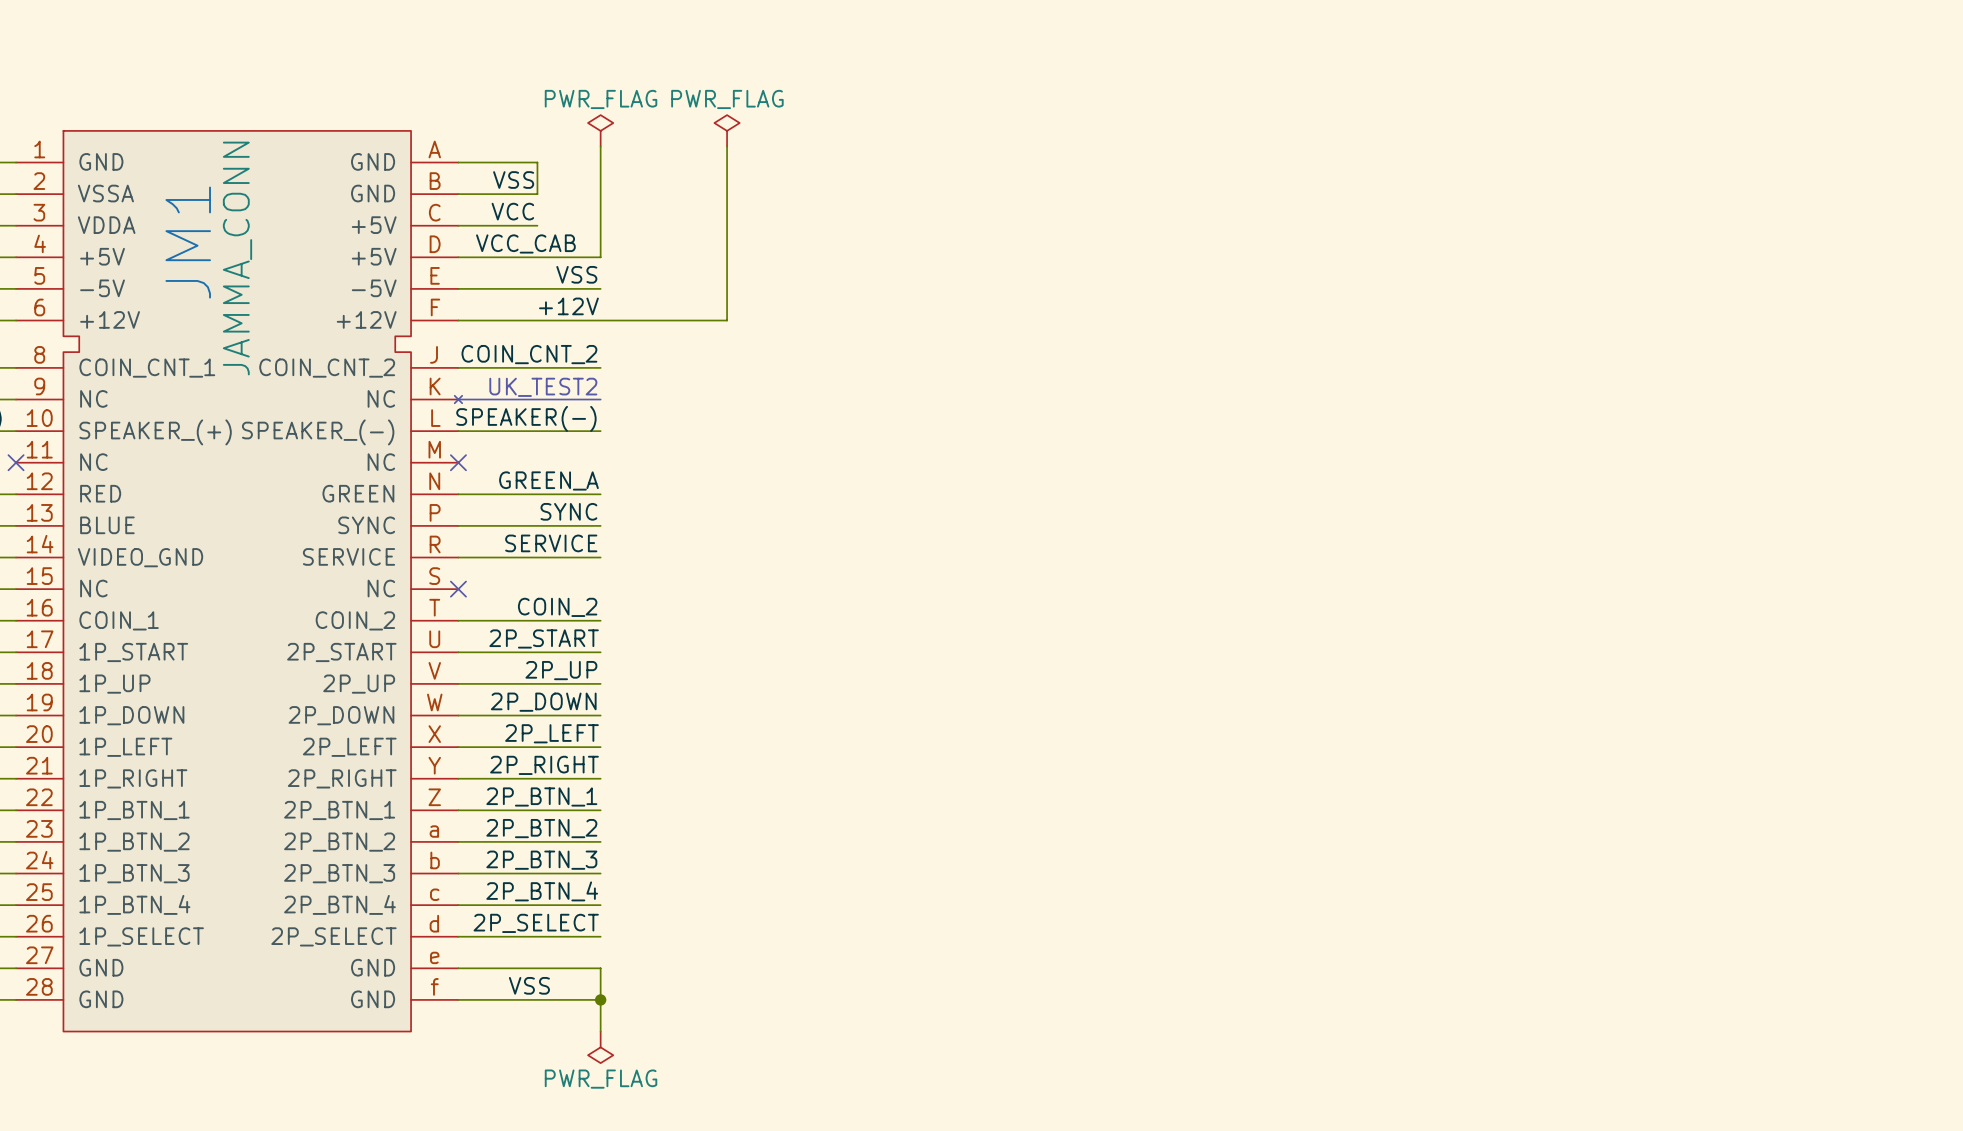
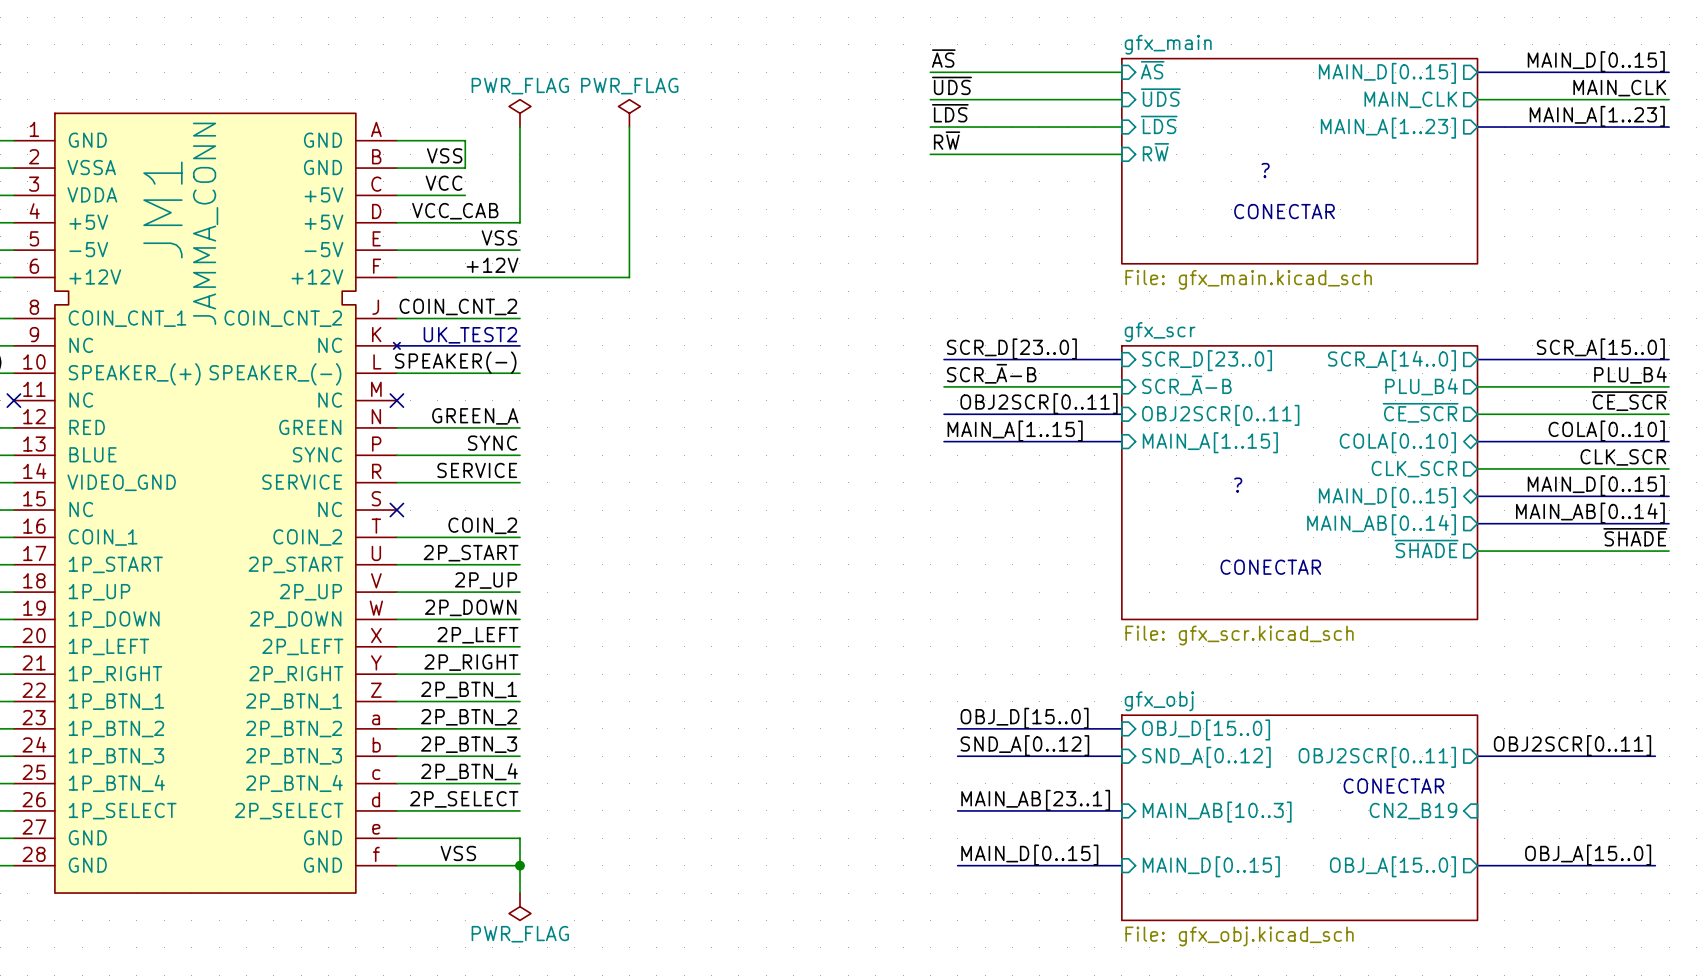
label: none -> ~{AS} (943, 58)
label: none -> MAIN_D[0..15] (1596, 61)
sheet pin: none -> ~{AS} (1152, 70)
wire: none -> (930, 72) (1121, 72)
bus: none -> (1477, 72) (1669, 72)
sheet pin: none -> MAIN_D[0..15] (1387, 73)
label: none -> ~{UDS} (951, 85)
label: none -> MAIN_CLK (1619, 88)
sheet pin: none -> ~{UDS} (1160, 97)
wire: none -> (930, 99) (1121, 99)
sheet pin: none -> MAIN_CLK (1410, 99)
wire: none -> (1477, 99) (1669, 99)
label: none -> ~{LDS} (950, 113)
label: none -> MAIN_A[1..23] (1597, 116)
sheet pin: none -> ~{LDS} (1159, 124)
wire: none -> (930, 127) (1121, 127)
bus: none -> (1477, 127) (1669, 127)
sheet pin: none -> MAIN_A[1..23] (1388, 128)
label: none -> R~{W} (947, 140)
sheet pin: none -> R~{W} (1155, 152)
wire: none -> (930, 154) (1121, 154)
sheet gfx_main: none -> File: gfx_main.kicad_sch (1299, 161)
text: none -> ? (1265, 170)
text: none -> CONECTAR (1284, 211)
label: none -> SCR_D[23..0] (1011, 348)
label: none -> SCR_A[15..0] (1600, 348)
bus: none -> (944, 359) (1121, 359)
bus: none -> (1477, 359) (1669, 359)
sheet pin: none -> SCR_D[23..0] (1207, 360)
sheet pin: none -> SCR_A[14..0] (1391, 360)
label: none -> SCR_~{A}-B (991, 373)
label: none -> PLU_B4 (1630, 375)
sheet pin: none -> SCR_~{A}-B (1186, 385)
wire: none -> (944, 386) (1121, 386)
sheet pin: none -> PLU_B4 (1421, 386)
wire: none -> (1477, 386) (1669, 386)
label: none -> ~{CE_SCR} (1629, 401)
label: none -> OBJ2SCR[0..11] (1039, 403)
sheet pin: none -> ~{CE_SCR} (1420, 412)
bus: none -> (944, 414) (1121, 414)
wire: none -> (1477, 414) (1669, 414)
sheet pin: none -> OBJ2SCR[0..11] (1220, 415)
label: none -> MAIN_A[1..15] (1015, 431)
label: none -> COLA[0..10] (1606, 431)
bus: none -> (944, 441) (1121, 441)
bus: none -> (1477, 441) (1669, 441)
sheet pin: none -> MAIN_A[1..15] (1210, 442)
sheet pin: none -> COLA[0..10] (1397, 442)
label: none -> CLK_SCR (1623, 457)
sheet pin: none -> CLK_SCR (1414, 469)
wire: none -> (1477, 468) (1669, 468)
sheet gfx_scr: none -> File: gfx_scr.kicad_sch (1299, 482)
text: none -> ? (1238, 485)
label: none -> MAIN_D[0..15] (1596, 485)
bus: none -> (1477, 496) (1669, 496)
sheet pin: none -> MAIN_D[0..15] (1387, 497)
label: none -> MAIN_AB[0..14] (1590, 513)
bus: none -> (1477, 523) (1669, 523)
sheet pin: none -> MAIN_AB[0..14] (1381, 524)
label: none -> ~{SHADE} (1635, 537)
sheet pin: none -> ~{SHADE} (1426, 548)
wire: none -> (1477, 551) (1669, 551)
text: none -> CONECTAR (1270, 567)
label: none -> OBJ_D[15..0] (1024, 718)
bus: none -> (957, 728) (1121, 728)
sheet pin: none -> OBJ_D[15..0] (1206, 729)
label: none -> SND_A[0..12] (1024, 745)
label: none -> OBJ2SCR[0..11] (1572, 745)
bus: none -> (957, 756) (1121, 756)
bus: none -> (1477, 756) (1655, 756)
sheet pin: none -> SND_A[0..12] (1206, 757)
sheet pin: none -> OBJ2SCR[0..11] (1377, 757)
text: none -> CONECTAR (1393, 786)
label: none -> MAIN_AB[23..1] (1035, 800)
bus: none -> (957, 810) (1121, 810)
sheet pin: none -> CN2_B19 (1413, 811)
sheet pin: none -> MAIN_AB[10..3] (1217, 812)
sheet gfx_obj: none -> File: gfx_obj.kicad_sch (1299, 817)
label: none -> MAIN_D[0..15] (1029, 855)
label: none -> OBJ_A[15..0] (1588, 855)
bus: none -> (957, 865) (1121, 865)
bus: none -> (1477, 865) (1655, 865)
sheet pin: none -> MAIN_D[0..15] (1211, 866)
sheet pin: none -> OBJ_A[15..0] (1392, 866)

